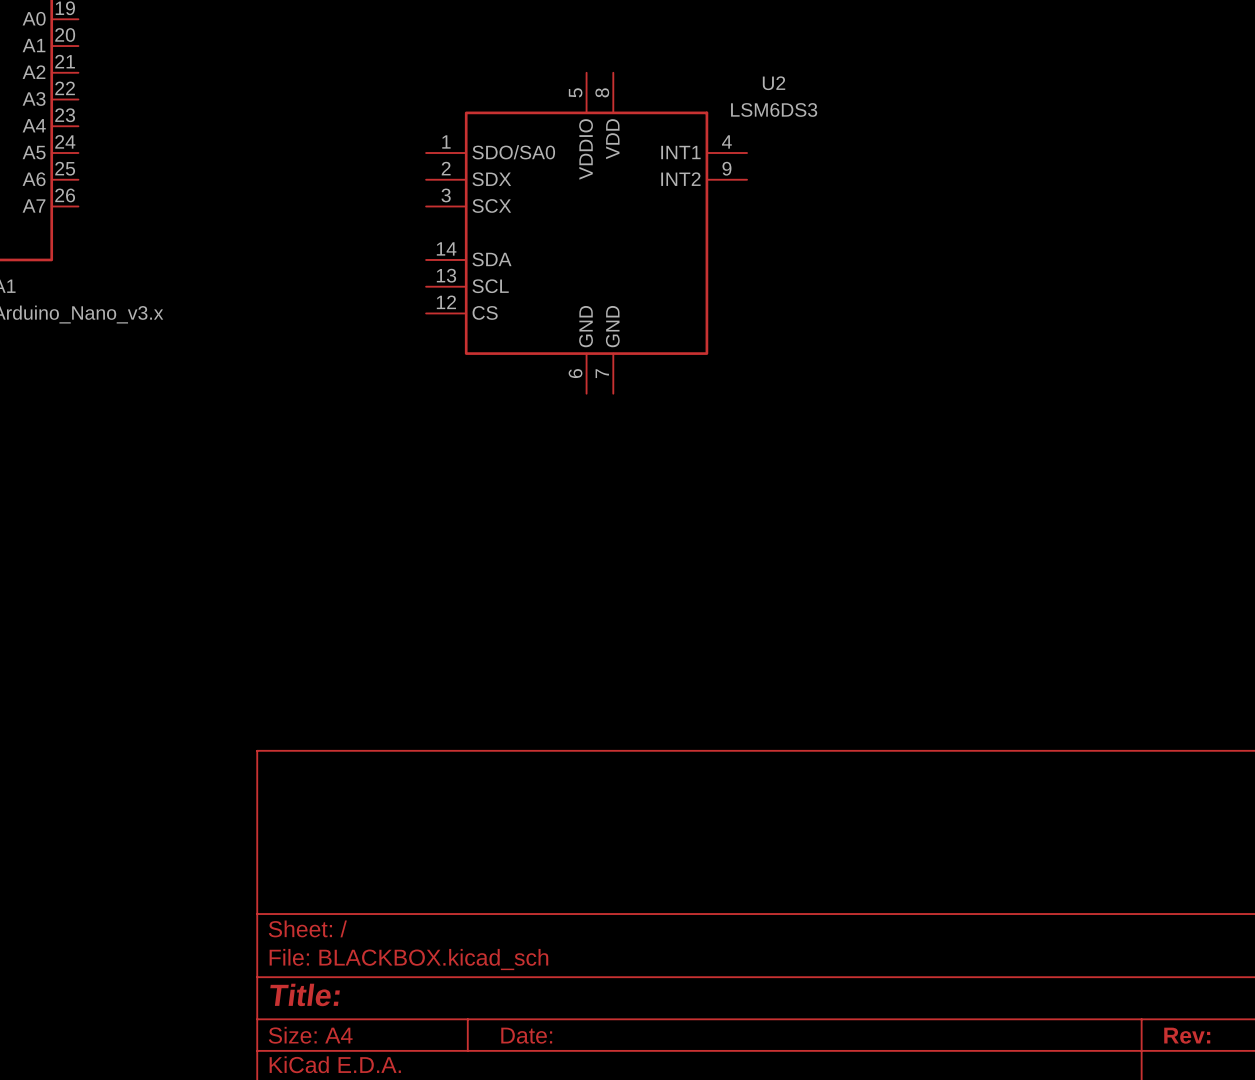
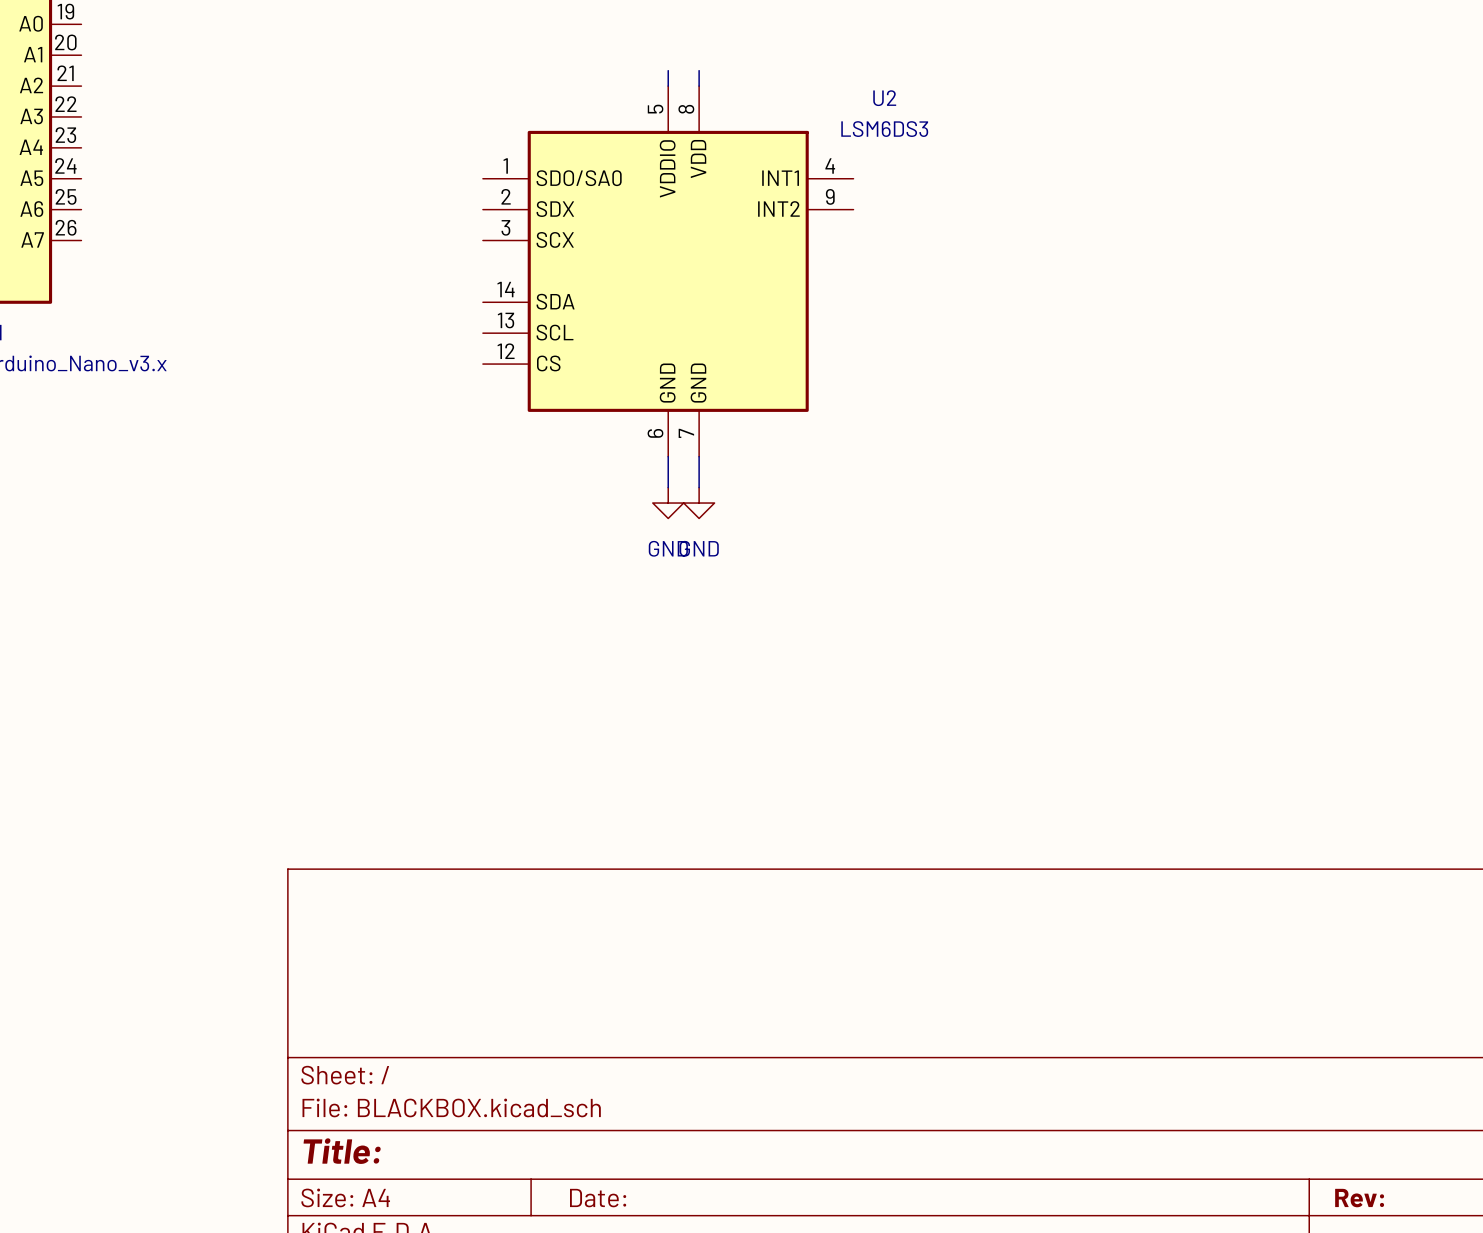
wire: none -> (668, 70) (668, 86)
wire: none -> (699, 70) (699, 86)
wire: none -> (668, 456) (668, 487)
wire: none -> (699, 456) (699, 487)
power symbol: none -> GND (668, 503)
power symbol: none -> GND (699, 503)

